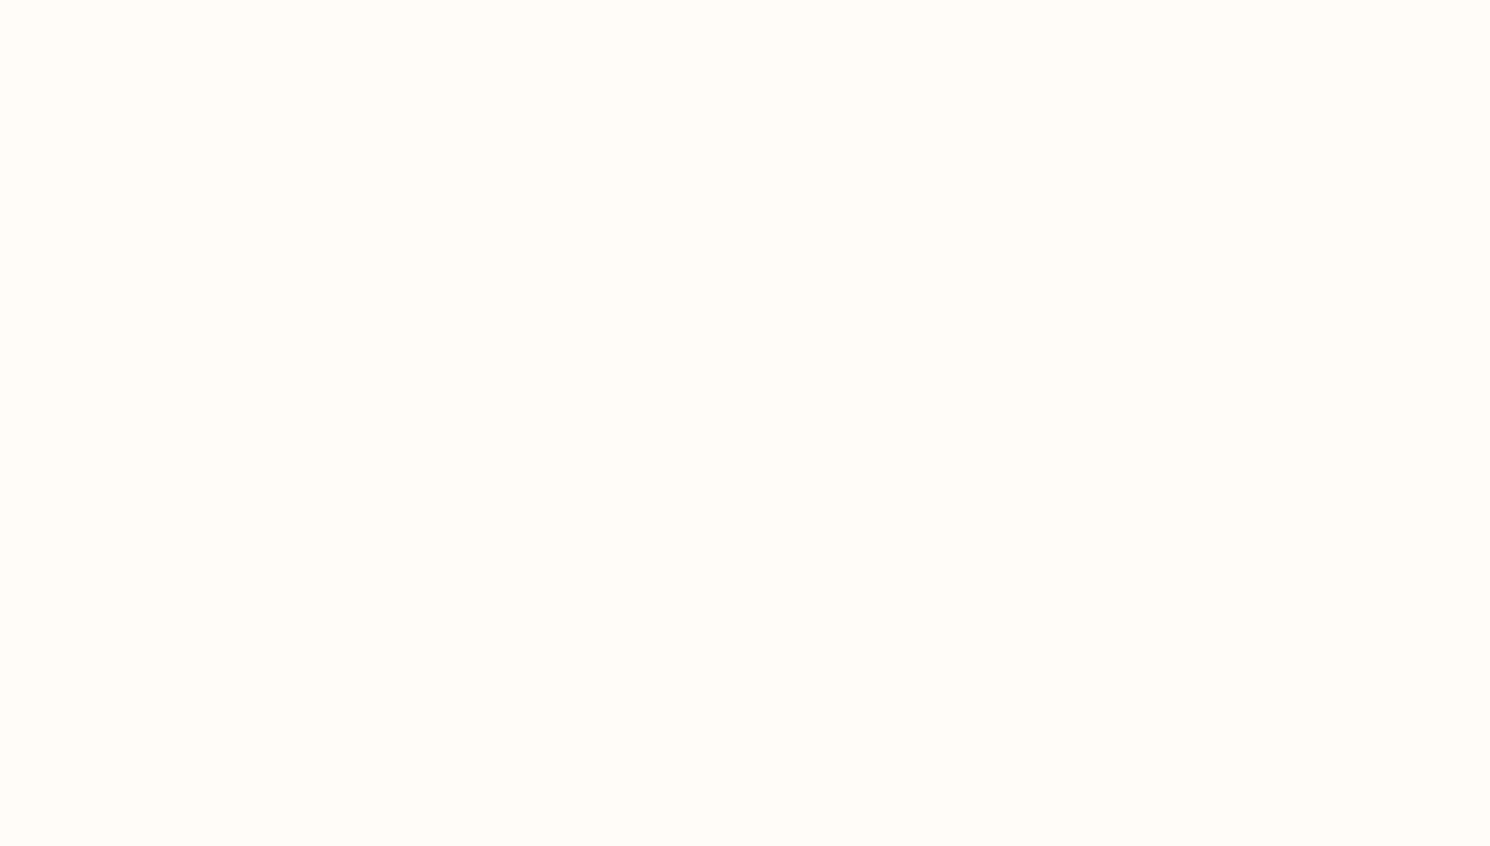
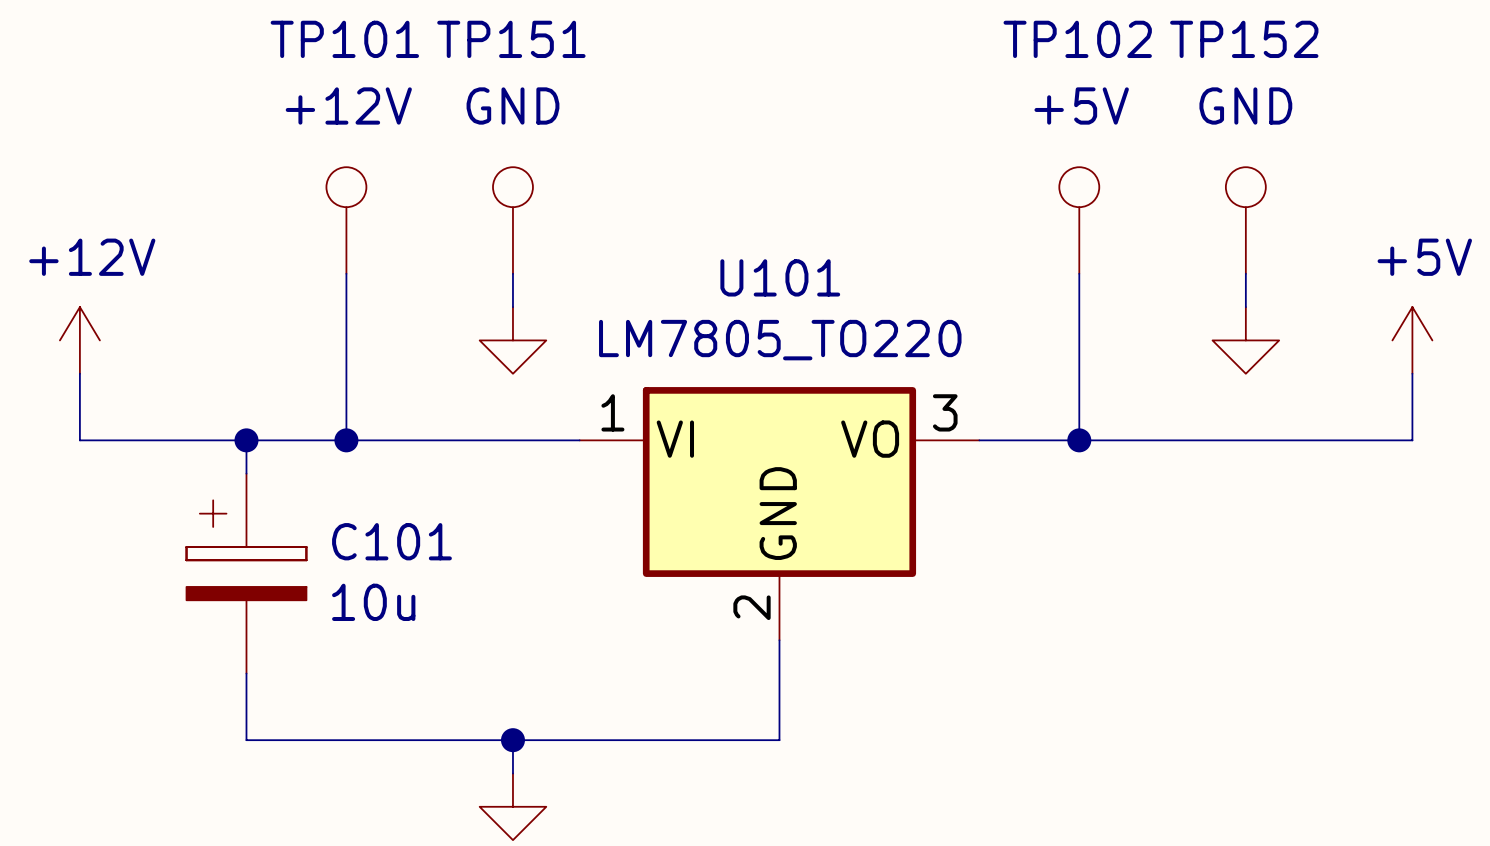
TP101: none -> +12V (346, 220)
TP151: none -> GND (512, 220)
TP102: none -> +5V (1079, 220)
TP152: none -> GND (1245, 220)
wire: none -> (346, 273) (346, 440)
wire: none -> (512, 273) (512, 307)
wire: none -> (1079, 273) (1079, 440)
wire: none -> (1245, 273) (1245, 307)
power symbol: none -> +12V (79, 340)
power symbol: none -> (512, 340)
power symbol: none -> (1245, 340)
power symbol: none -> +5V (1412, 340)
wire: none -> (79, 373) (79, 440) (579, 440)
wire: none -> (1412, 373) (1412, 440) (979, 440)
wire: none -> (246, 440) (246, 473)
junction: none -> (246, 440)
junction: none -> (346, 440)
junction: none -> (1079, 440)
U101: none -> LM7805_TO220 (779, 513)
C101: none -> 10u (246, 573)
wire: none -> (779, 640) (779, 740) (246, 740) (246, 673)
wire: none -> (512, 740) (512, 773)
junction: none -> (512, 740)
power symbol: none -> (512, 806)

